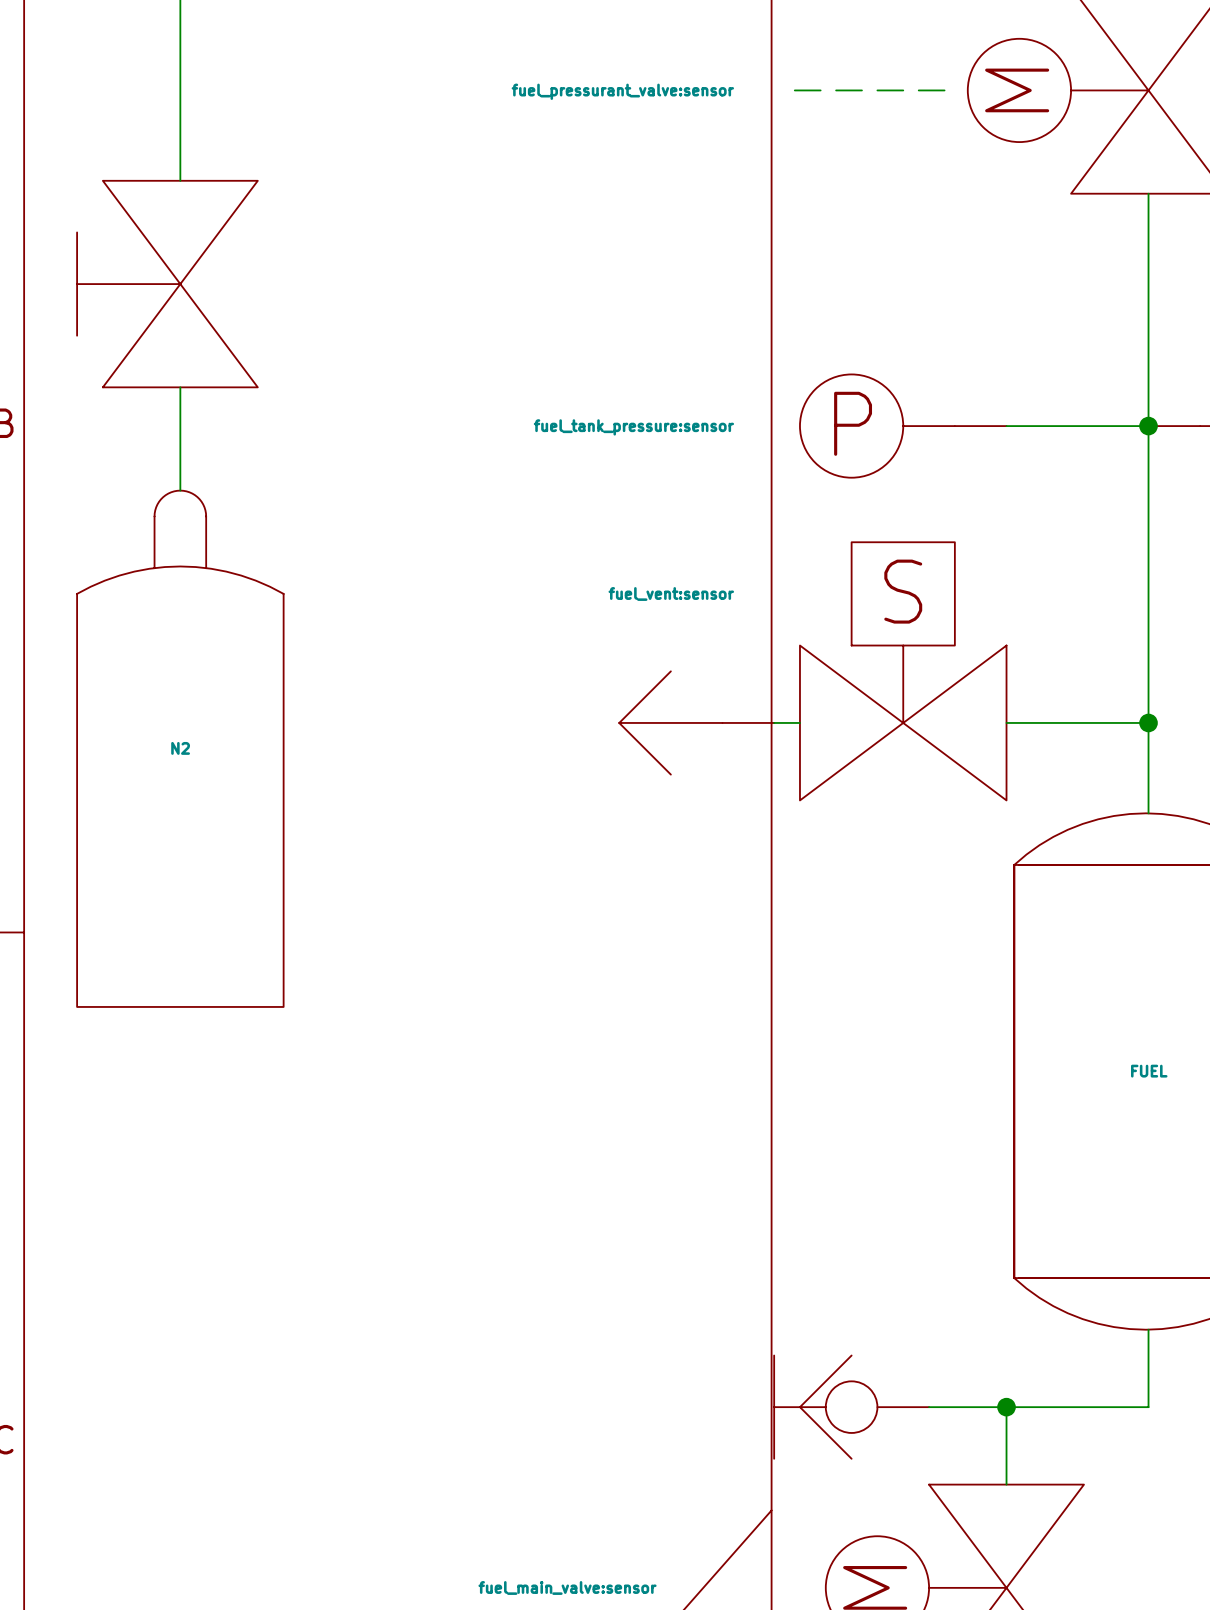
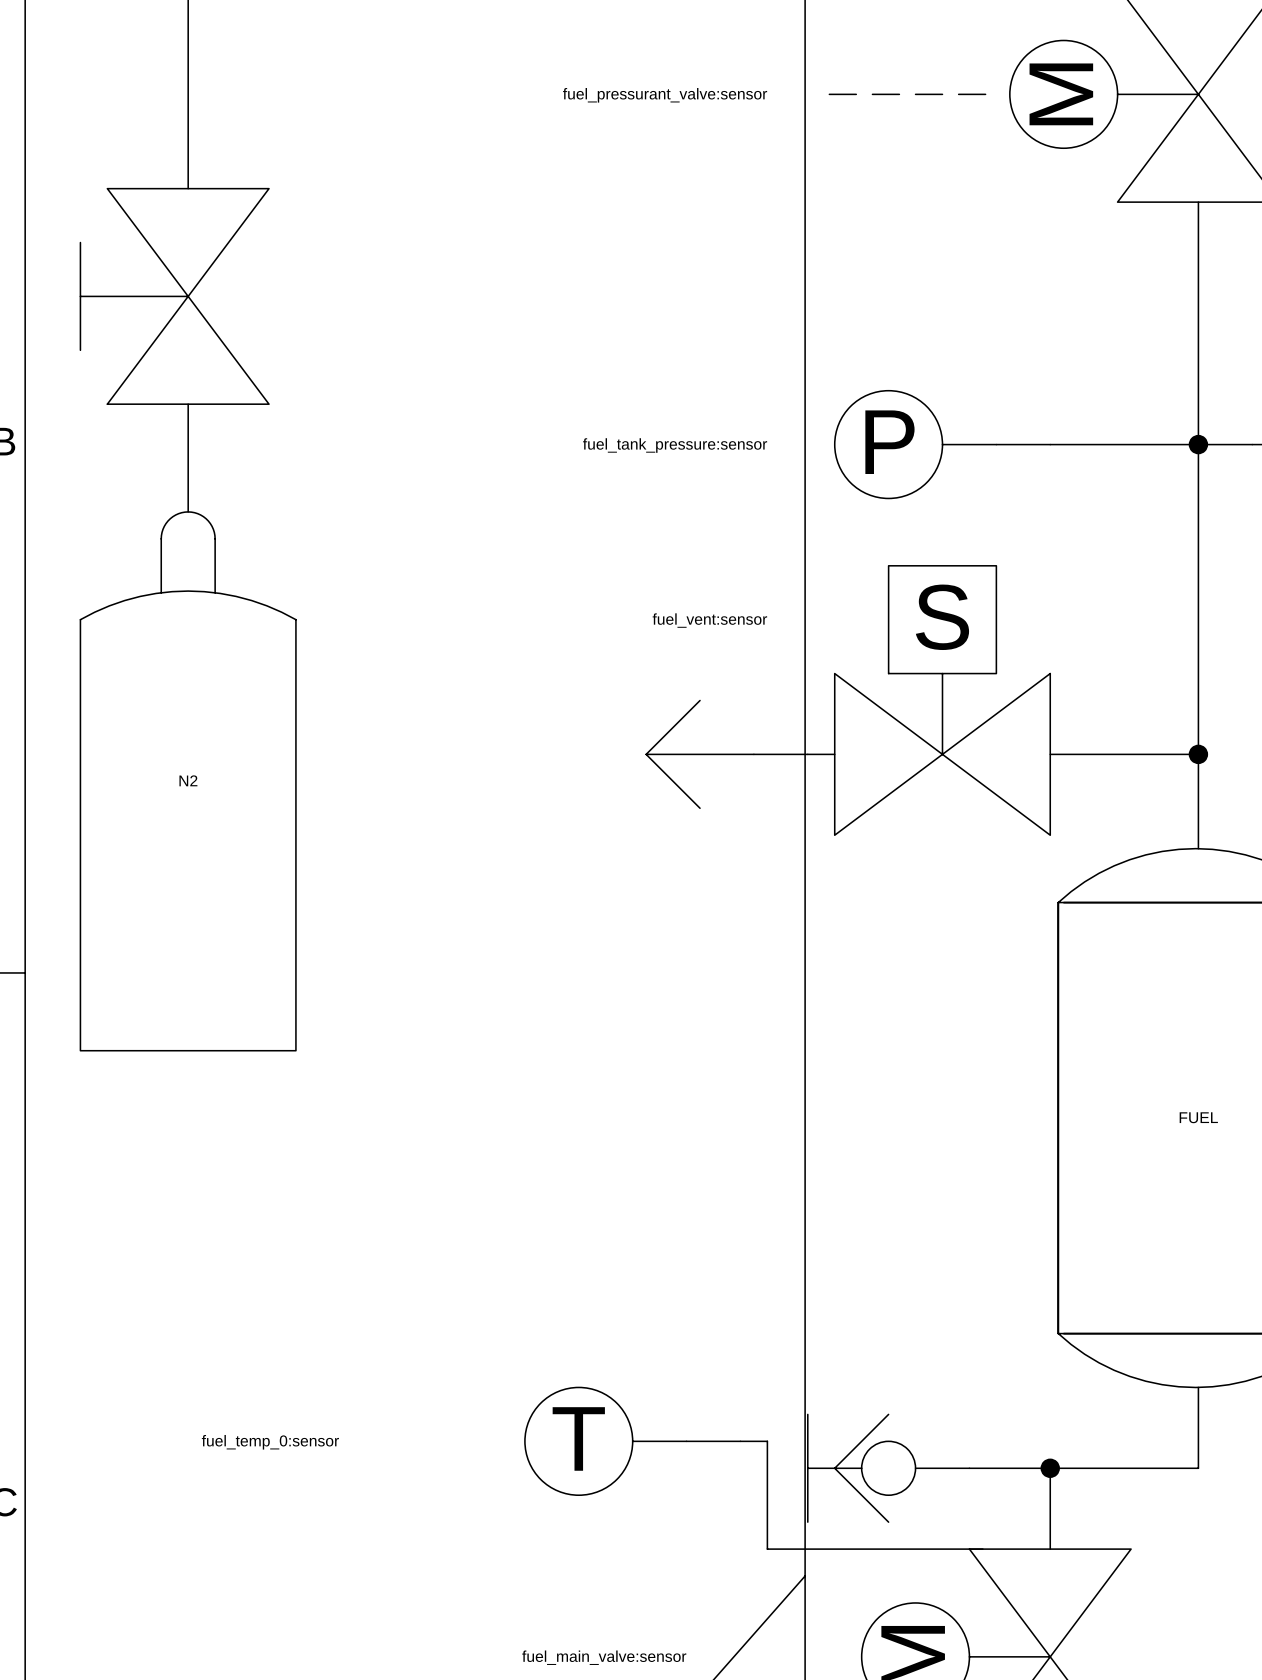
part: none -> fuel_temp_0:sensor (632, 1441)
wire: none -> (740, 1441) (767, 1441) (767, 1549) (982, 1549)

